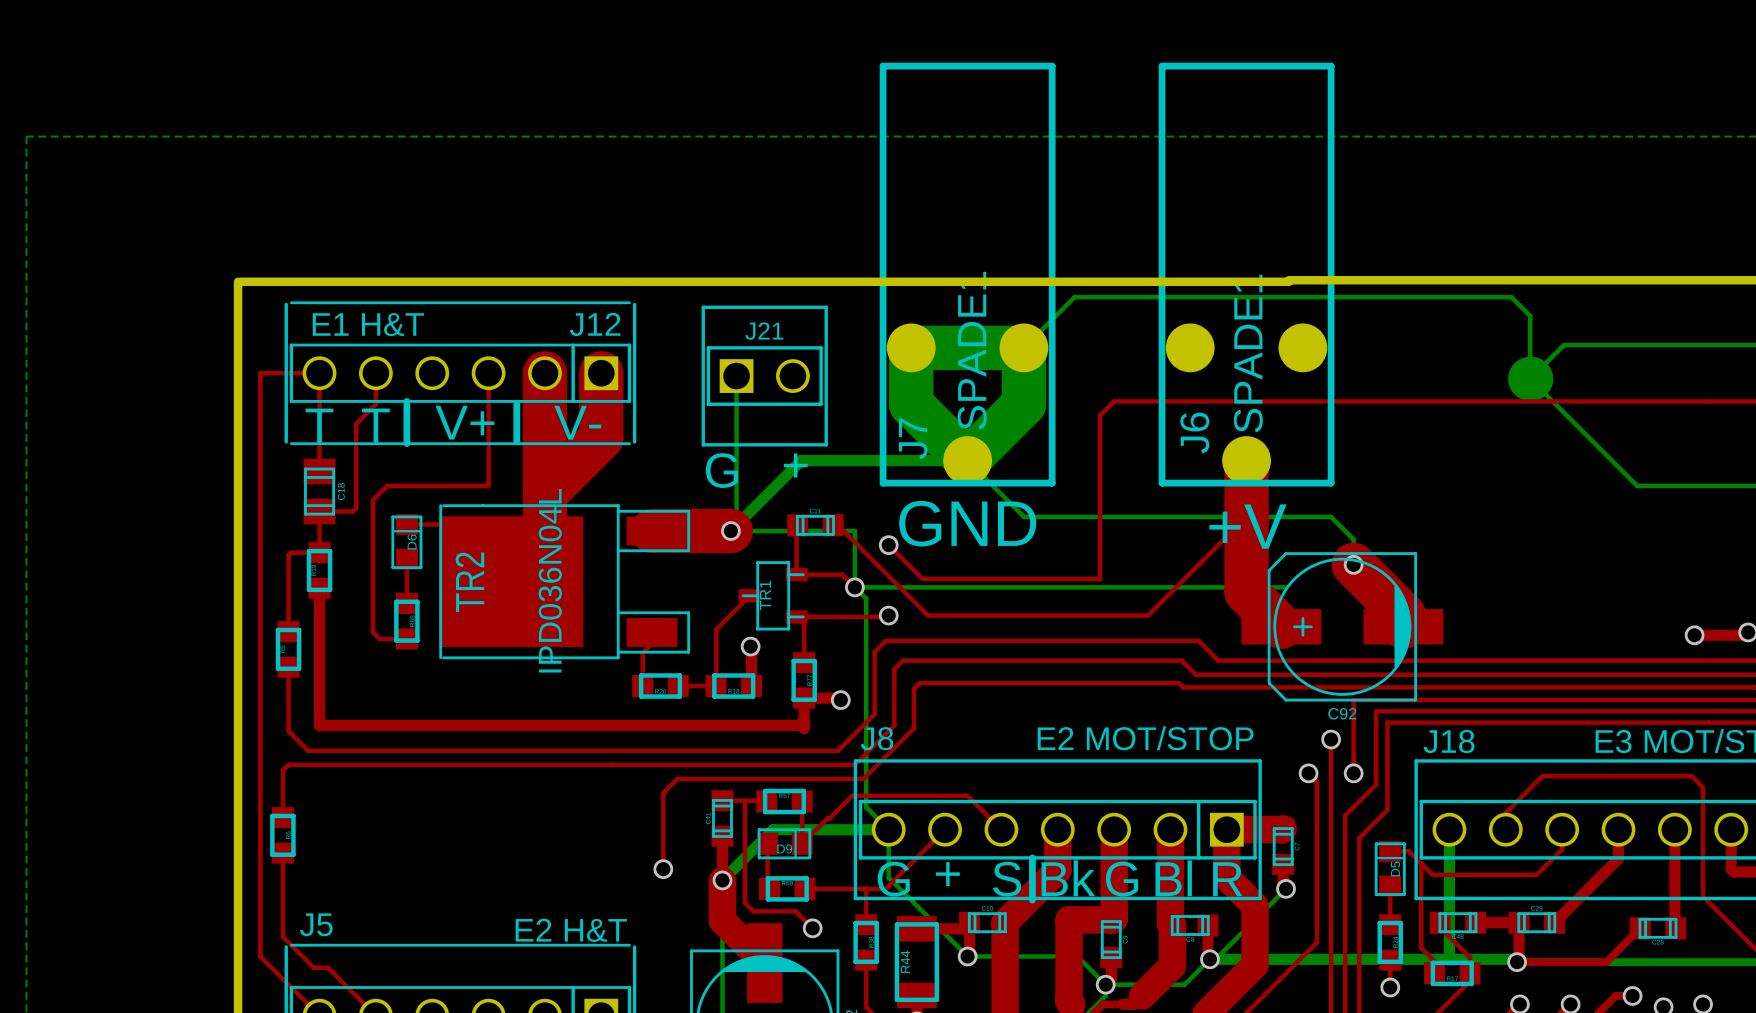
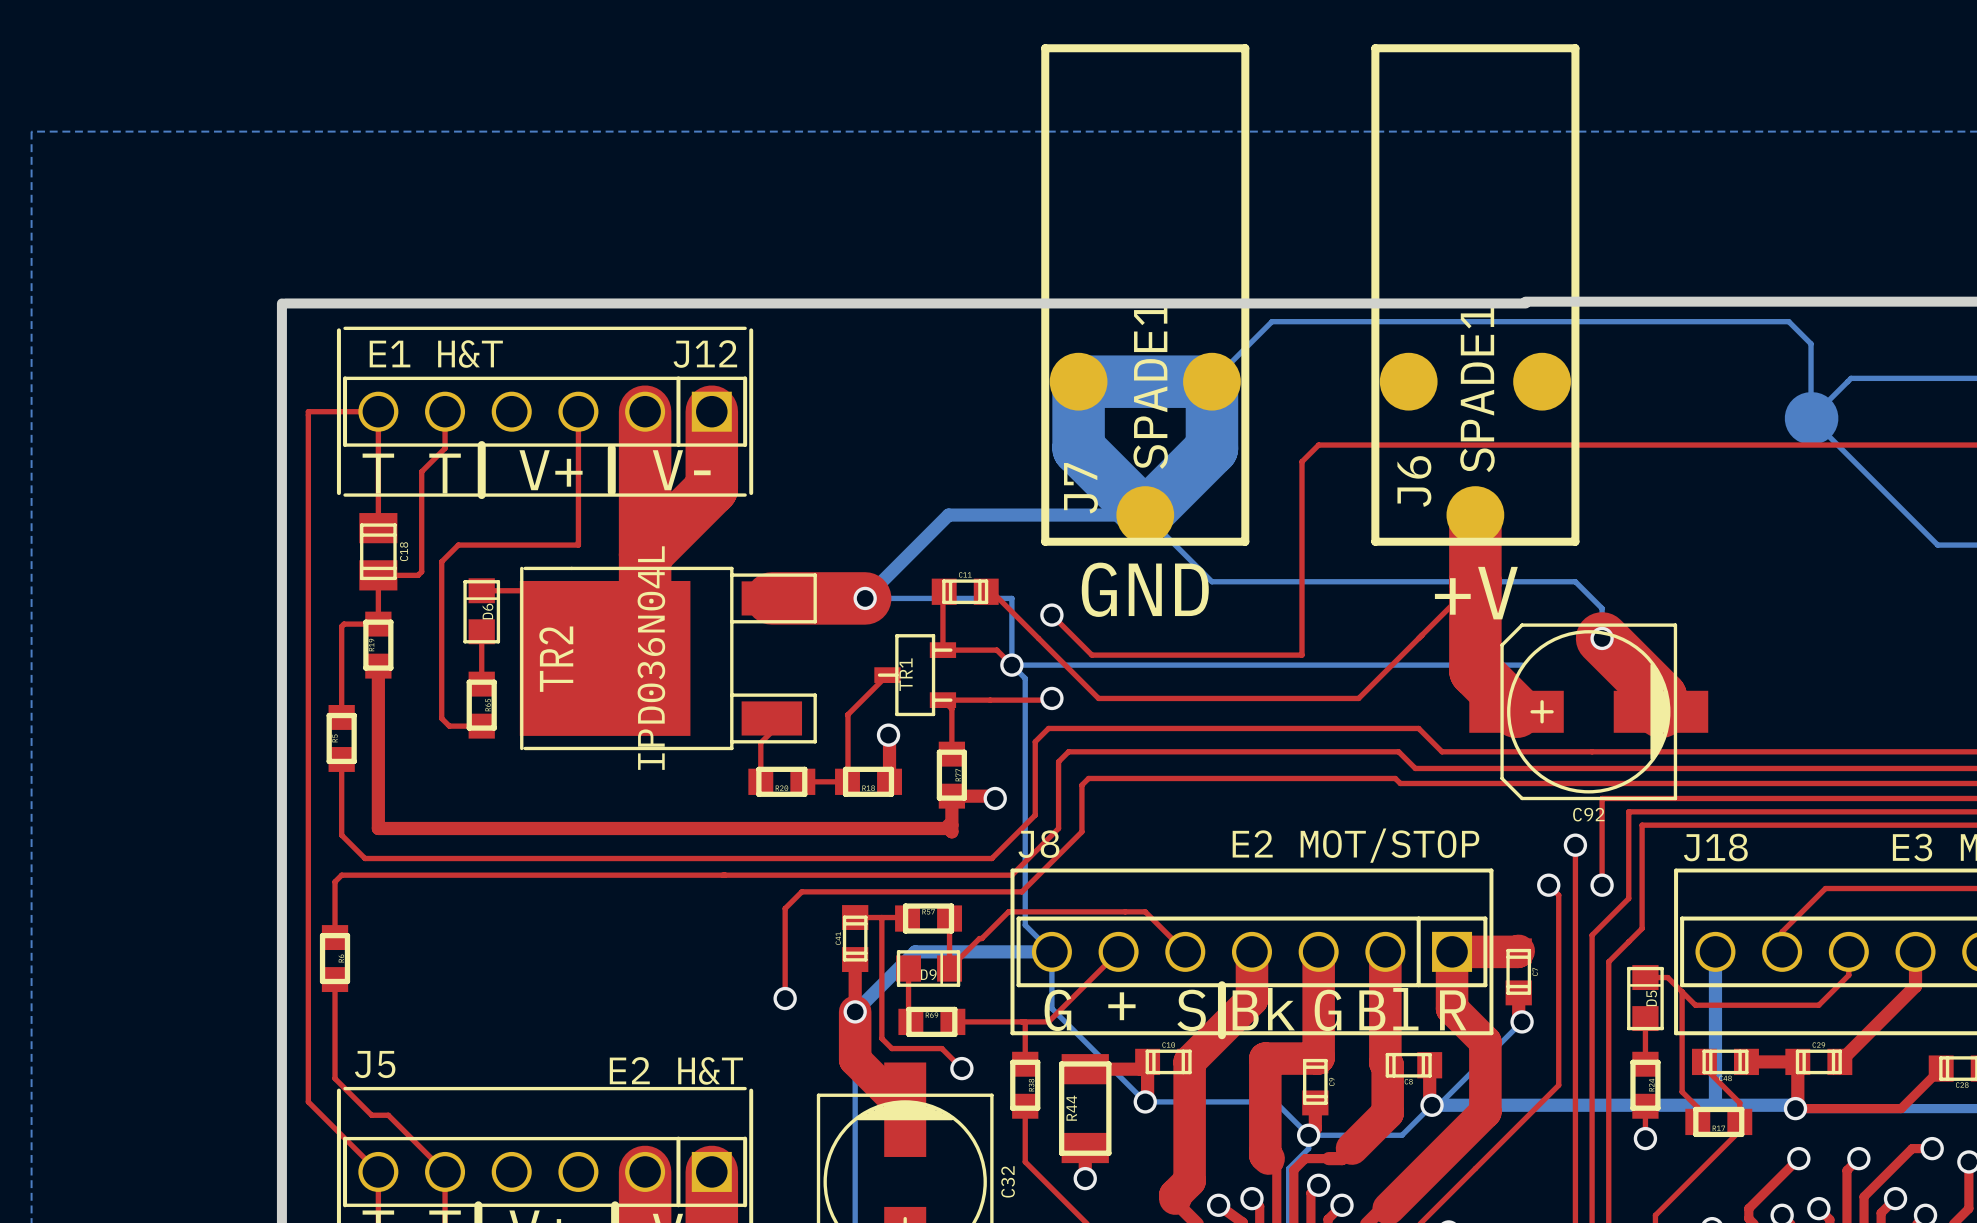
bottom track: (736, 376) (736, 525) (730, 531) -> none
J21: (764, 376) -> none
text: + (795, 465) -> none
text: G (721, 470) -> none

